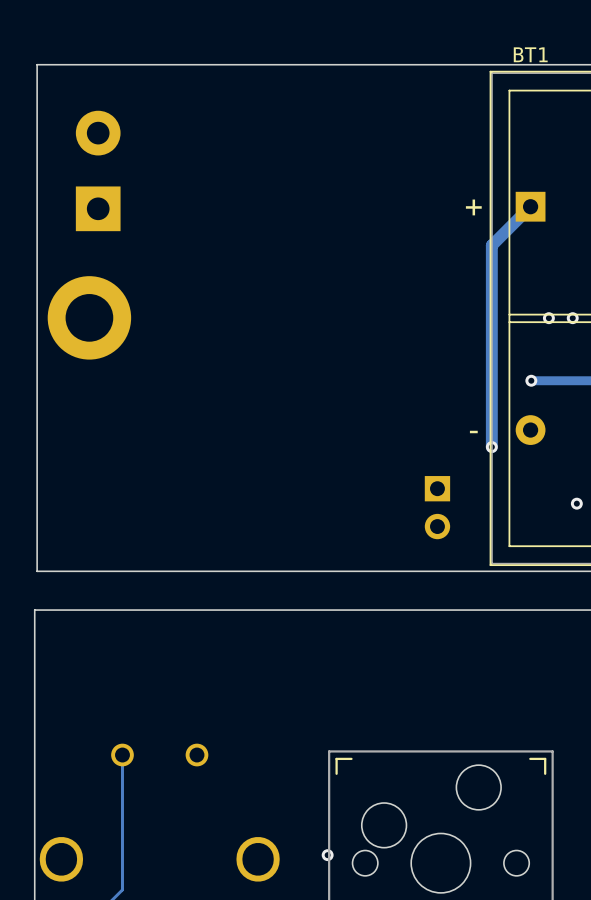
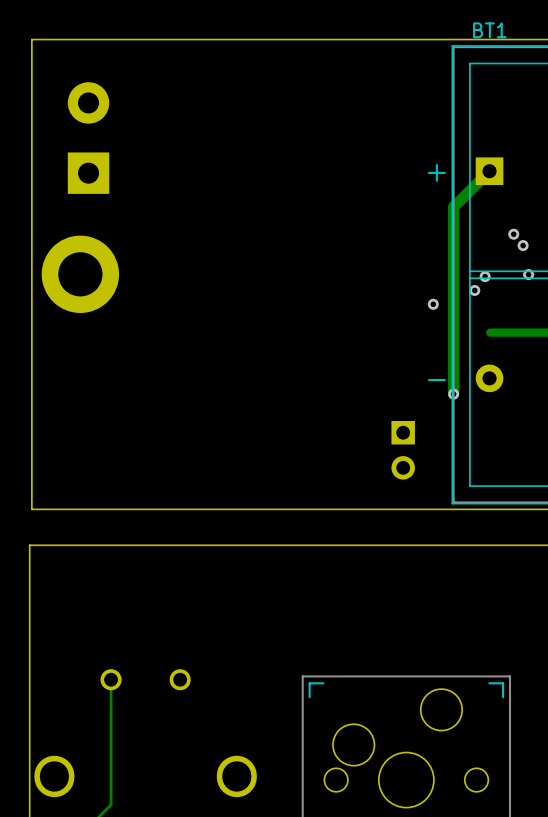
via: none -> (513, 234)
via: none -> (523, 245)
via: (548, 318) -> none
via: none -> (485, 276)
via: none -> (474, 290)
via: none -> (433, 304)
via: (531, 380) -> none
via: (576, 503) -> none
via: (327, 855) -> none

